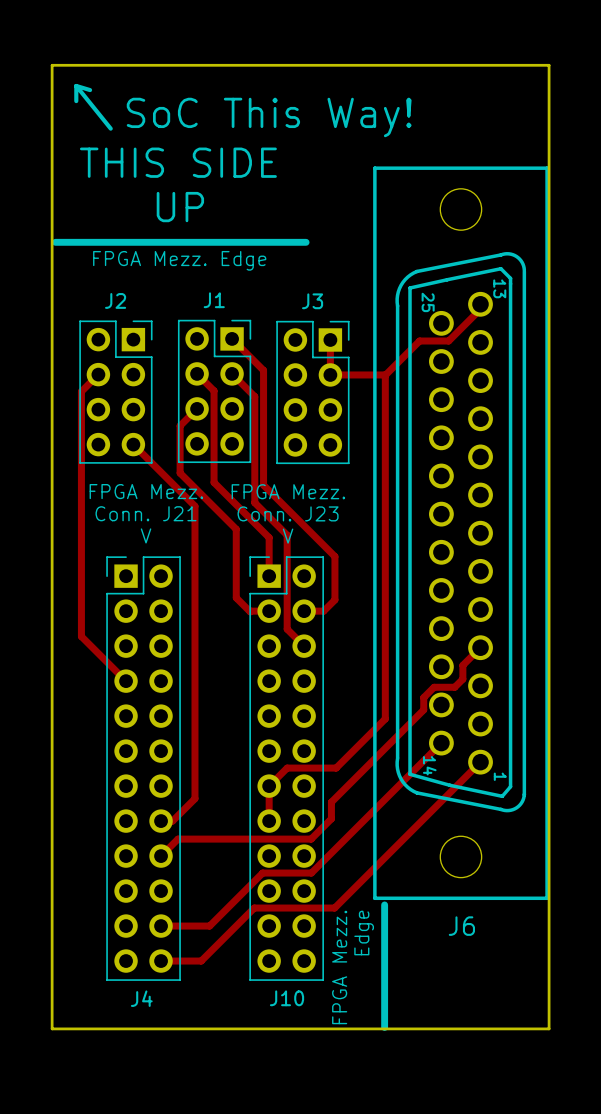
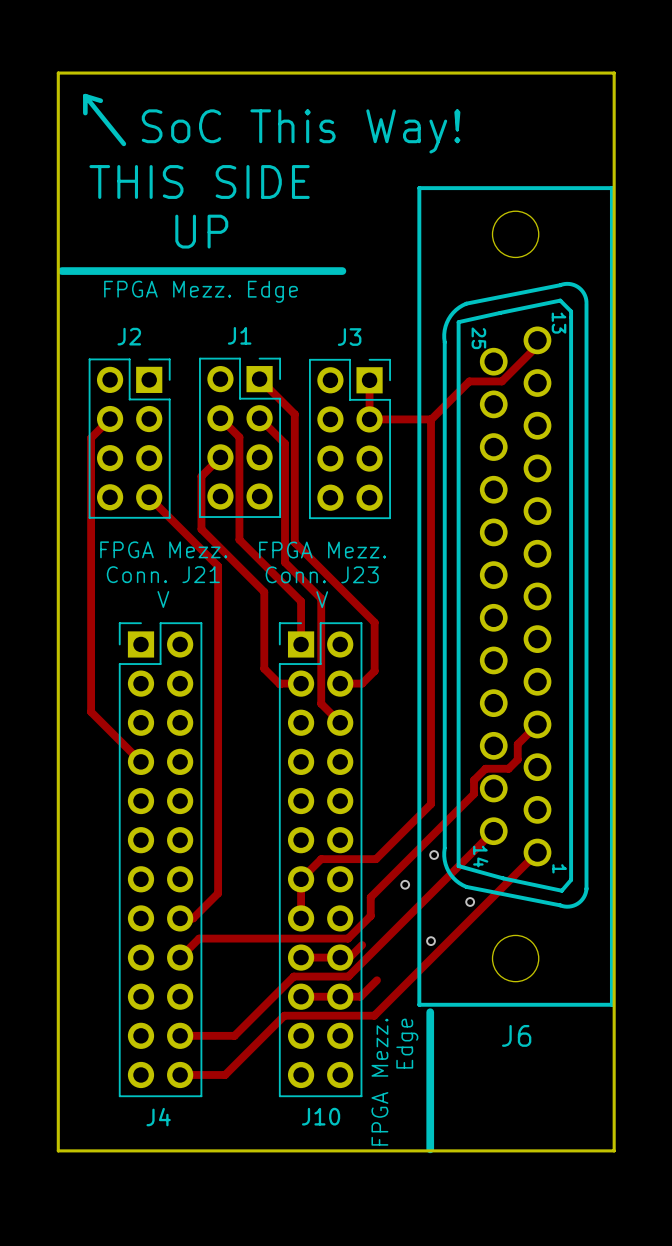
via: none -> (434, 855)
via: none -> (405, 884)
via: none -> (470, 901)
via: none -> (431, 941)
track: none -> (362, 945) (349, 957) (301, 957)
track: none -> (377, 980) (360, 996) (301, 996)

